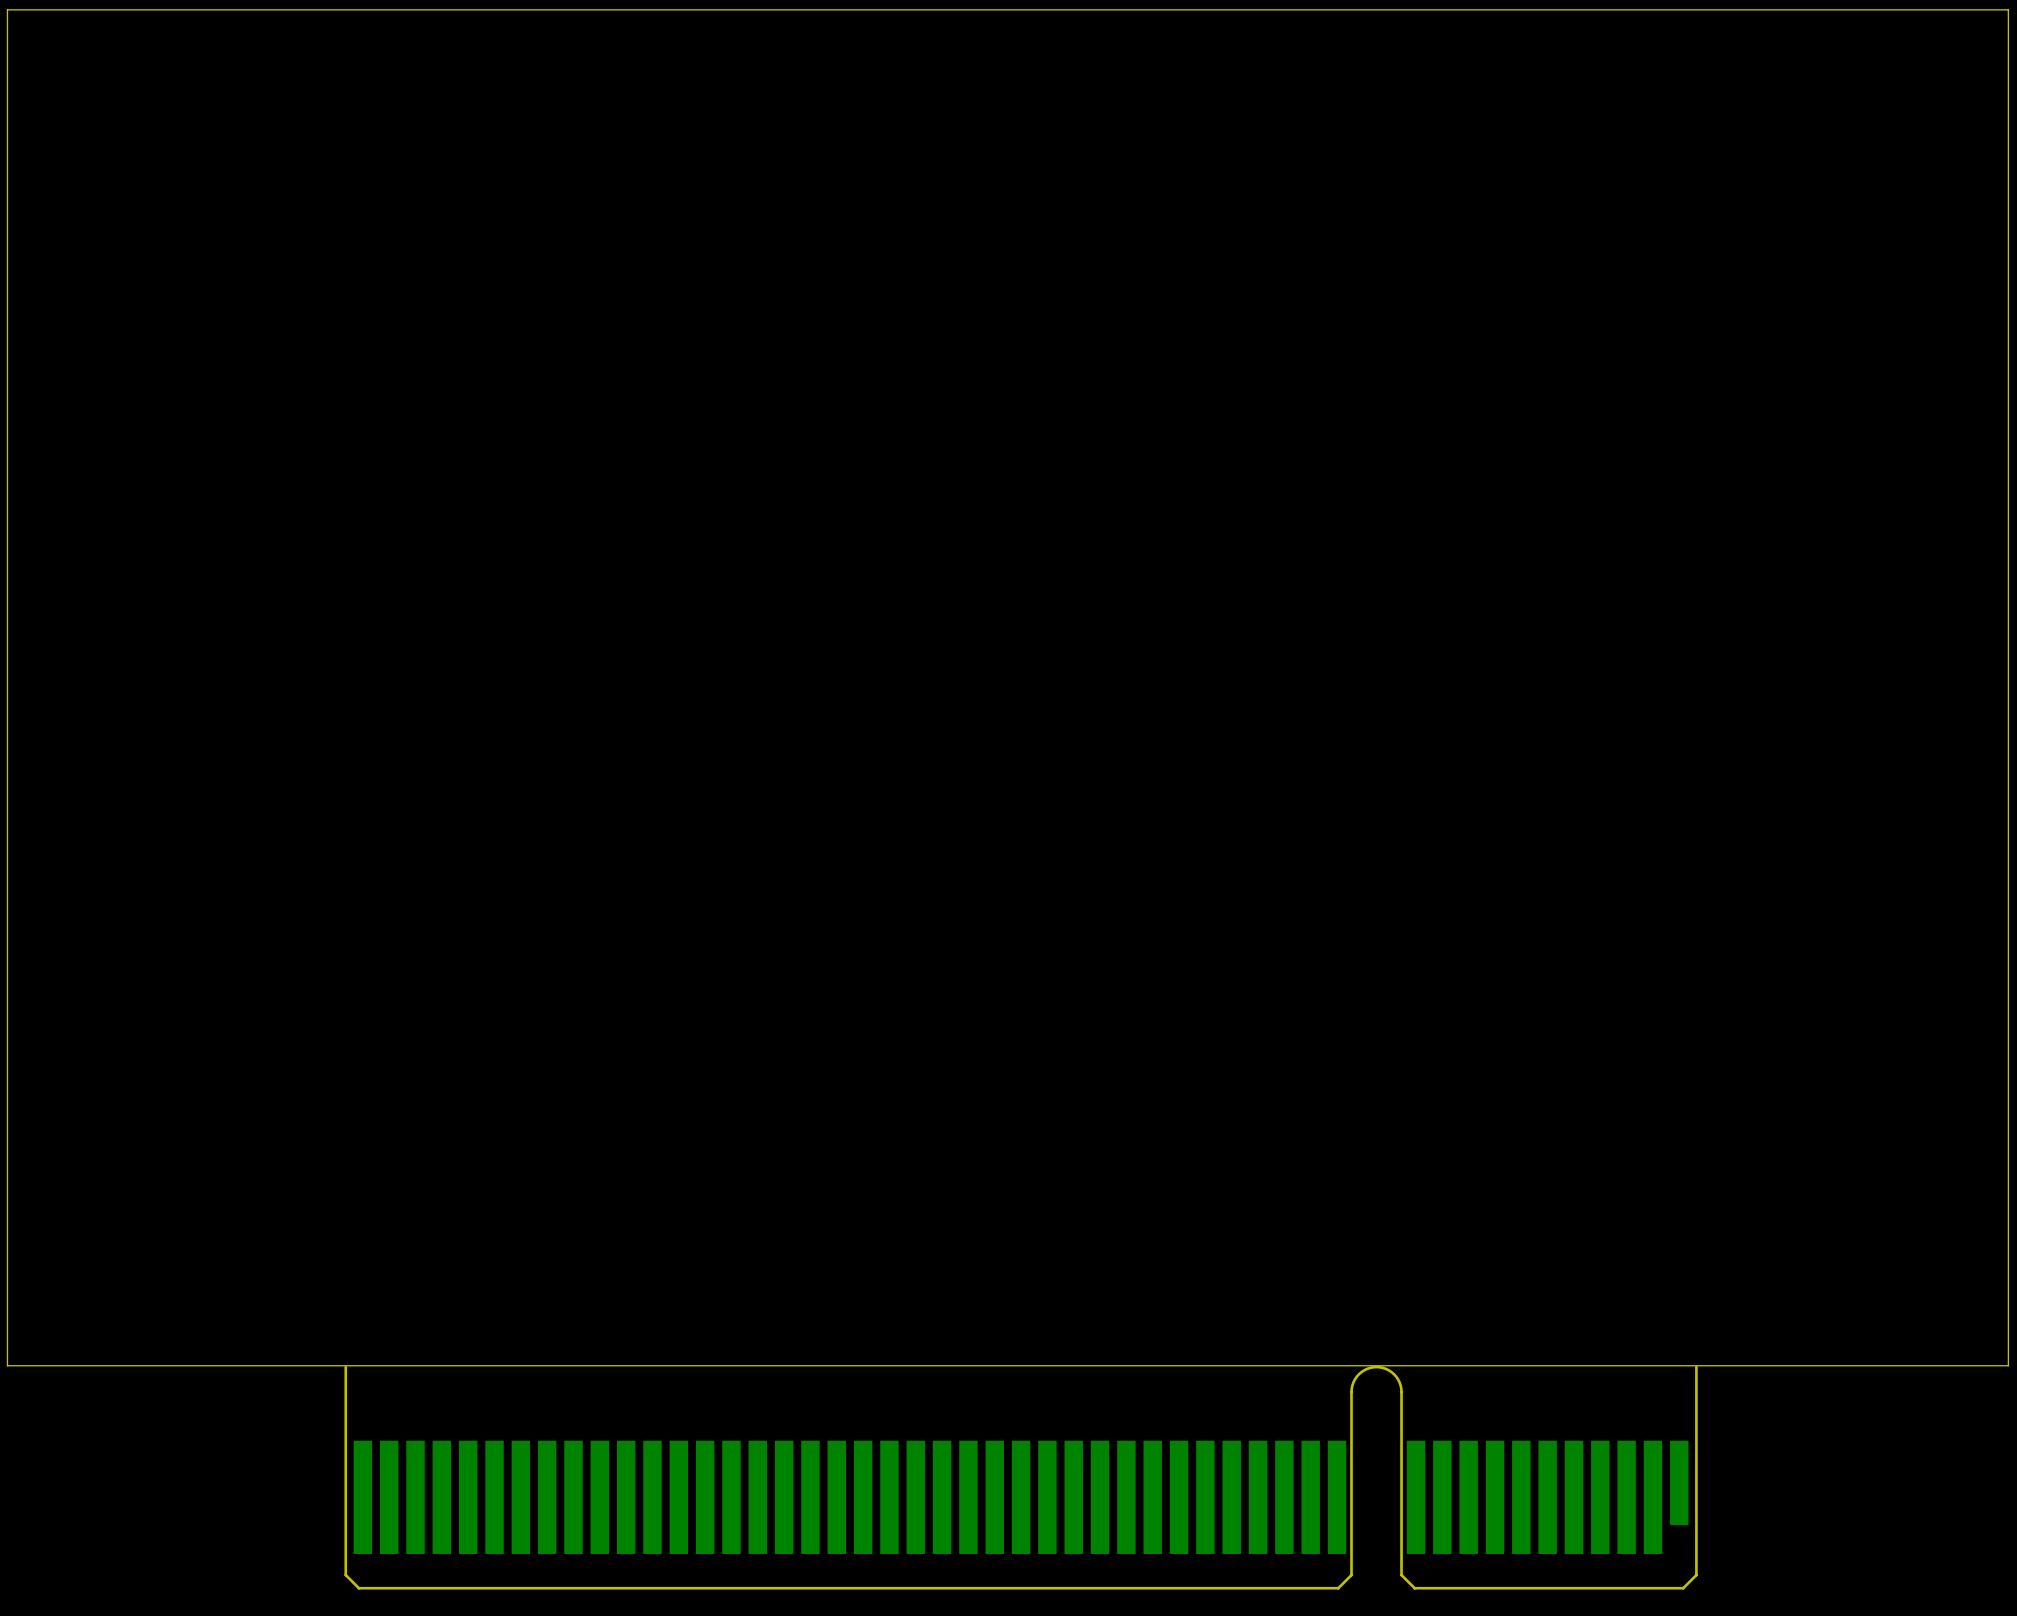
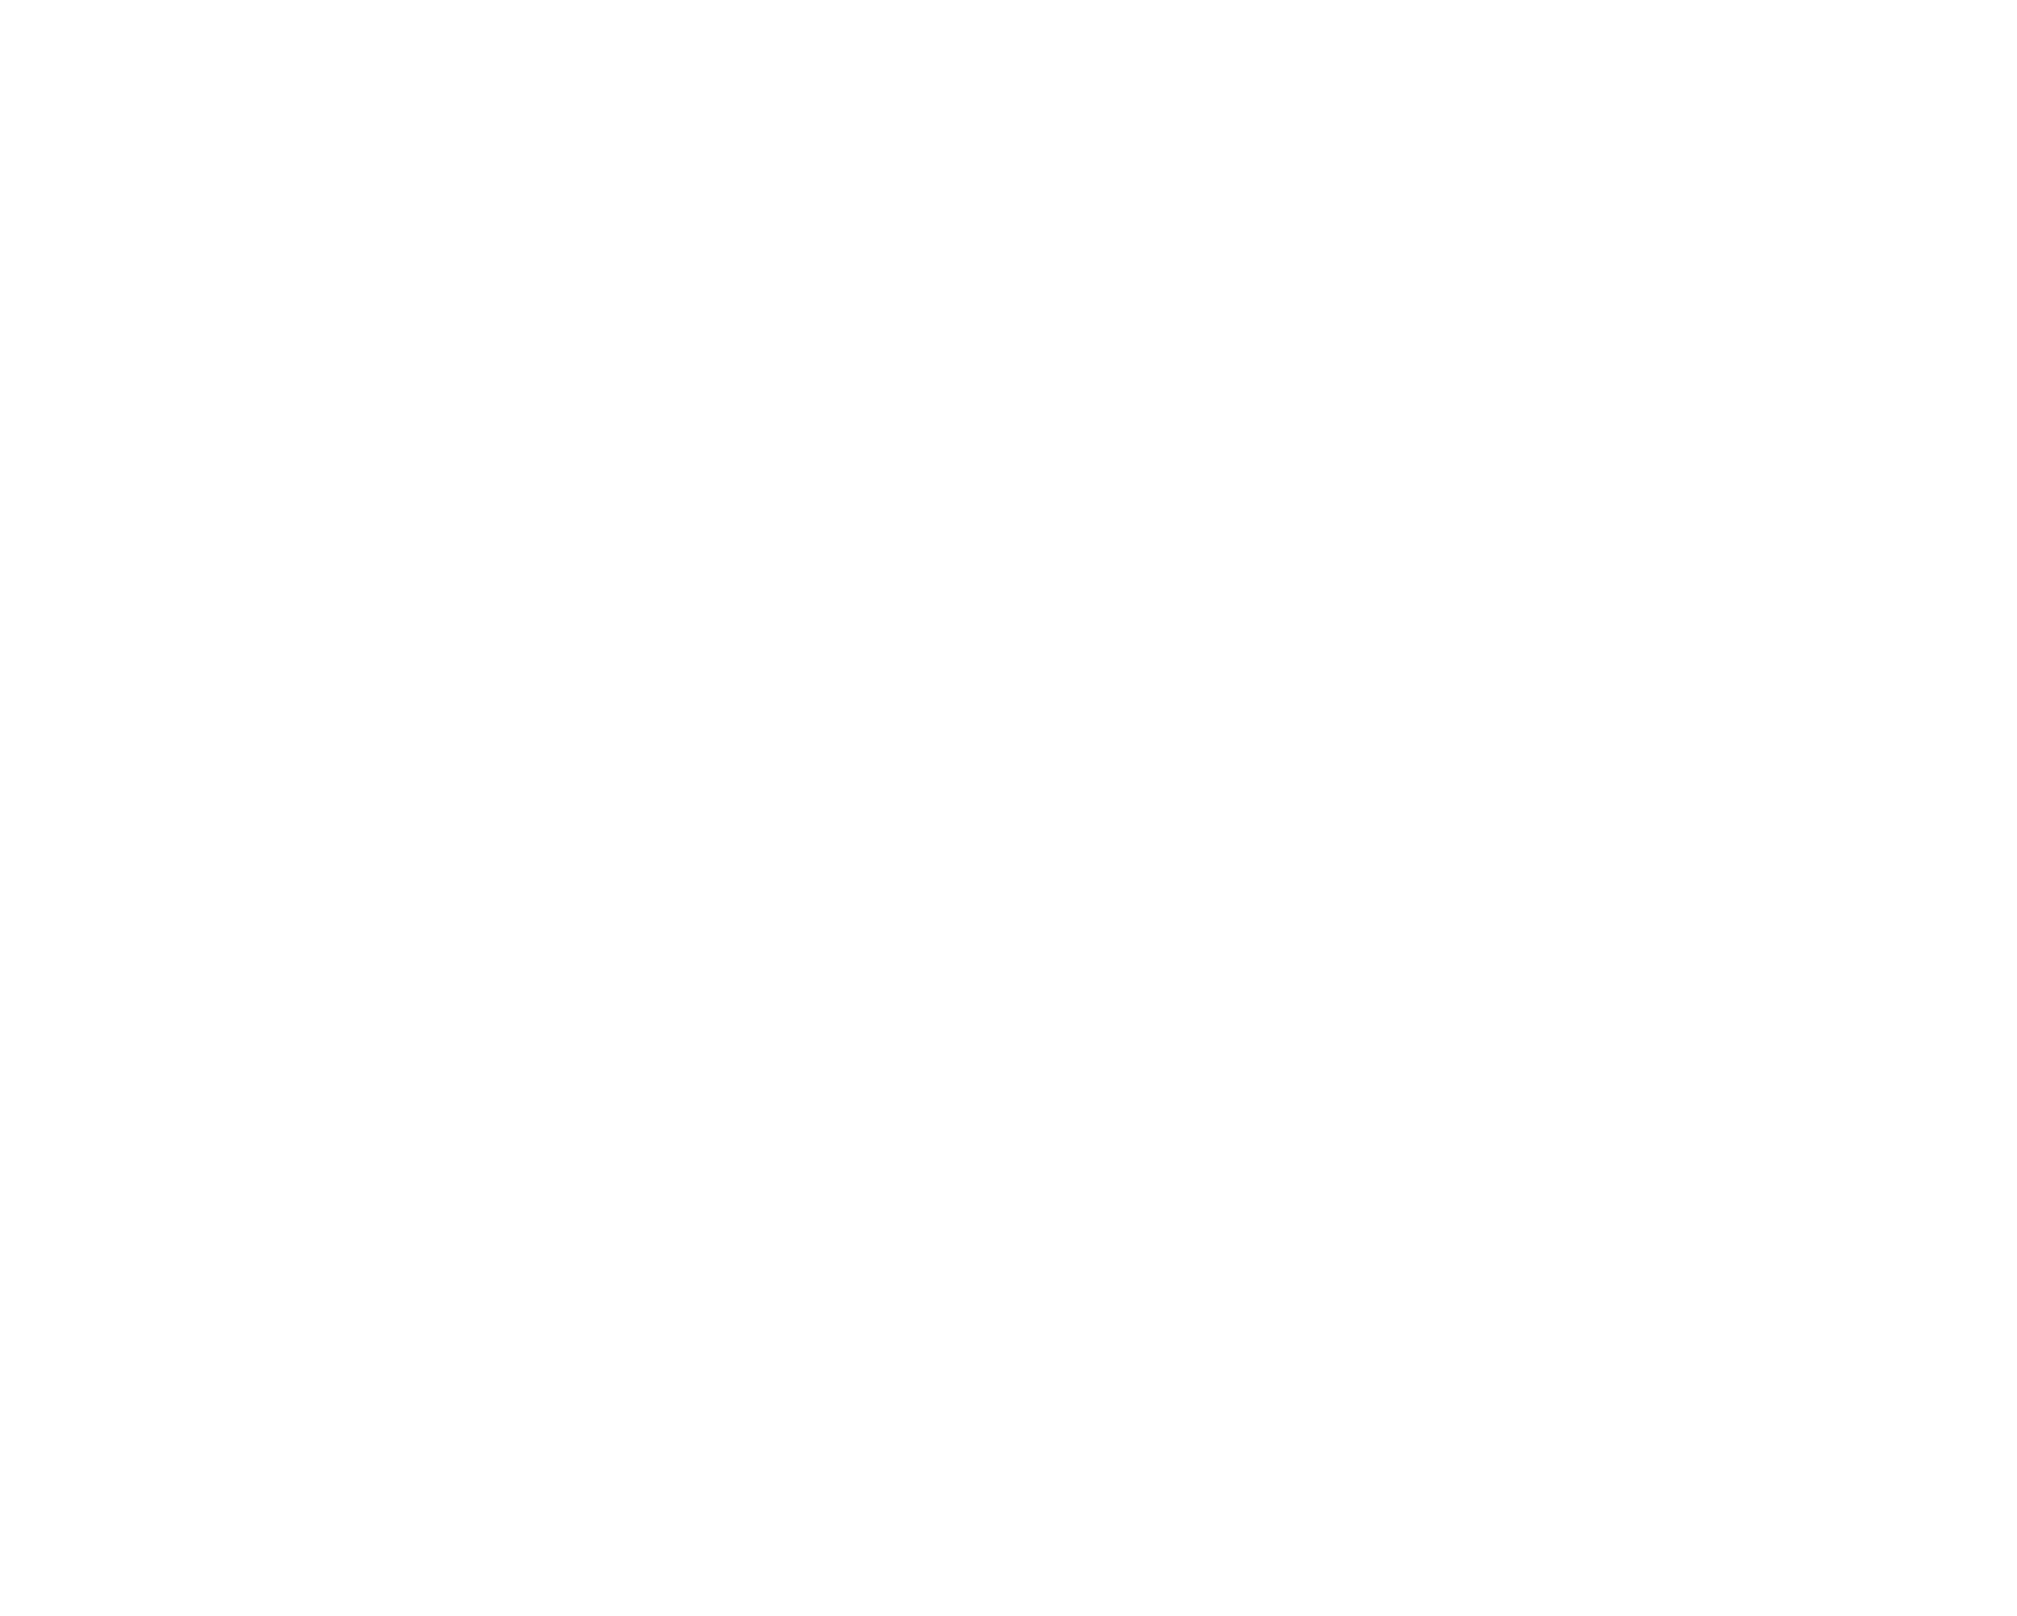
board edge: (2008, 9) (7, 9) (7, 1365) (2008, 1365) (2008, 9) -> none
part: (1021, 1477) -> none

